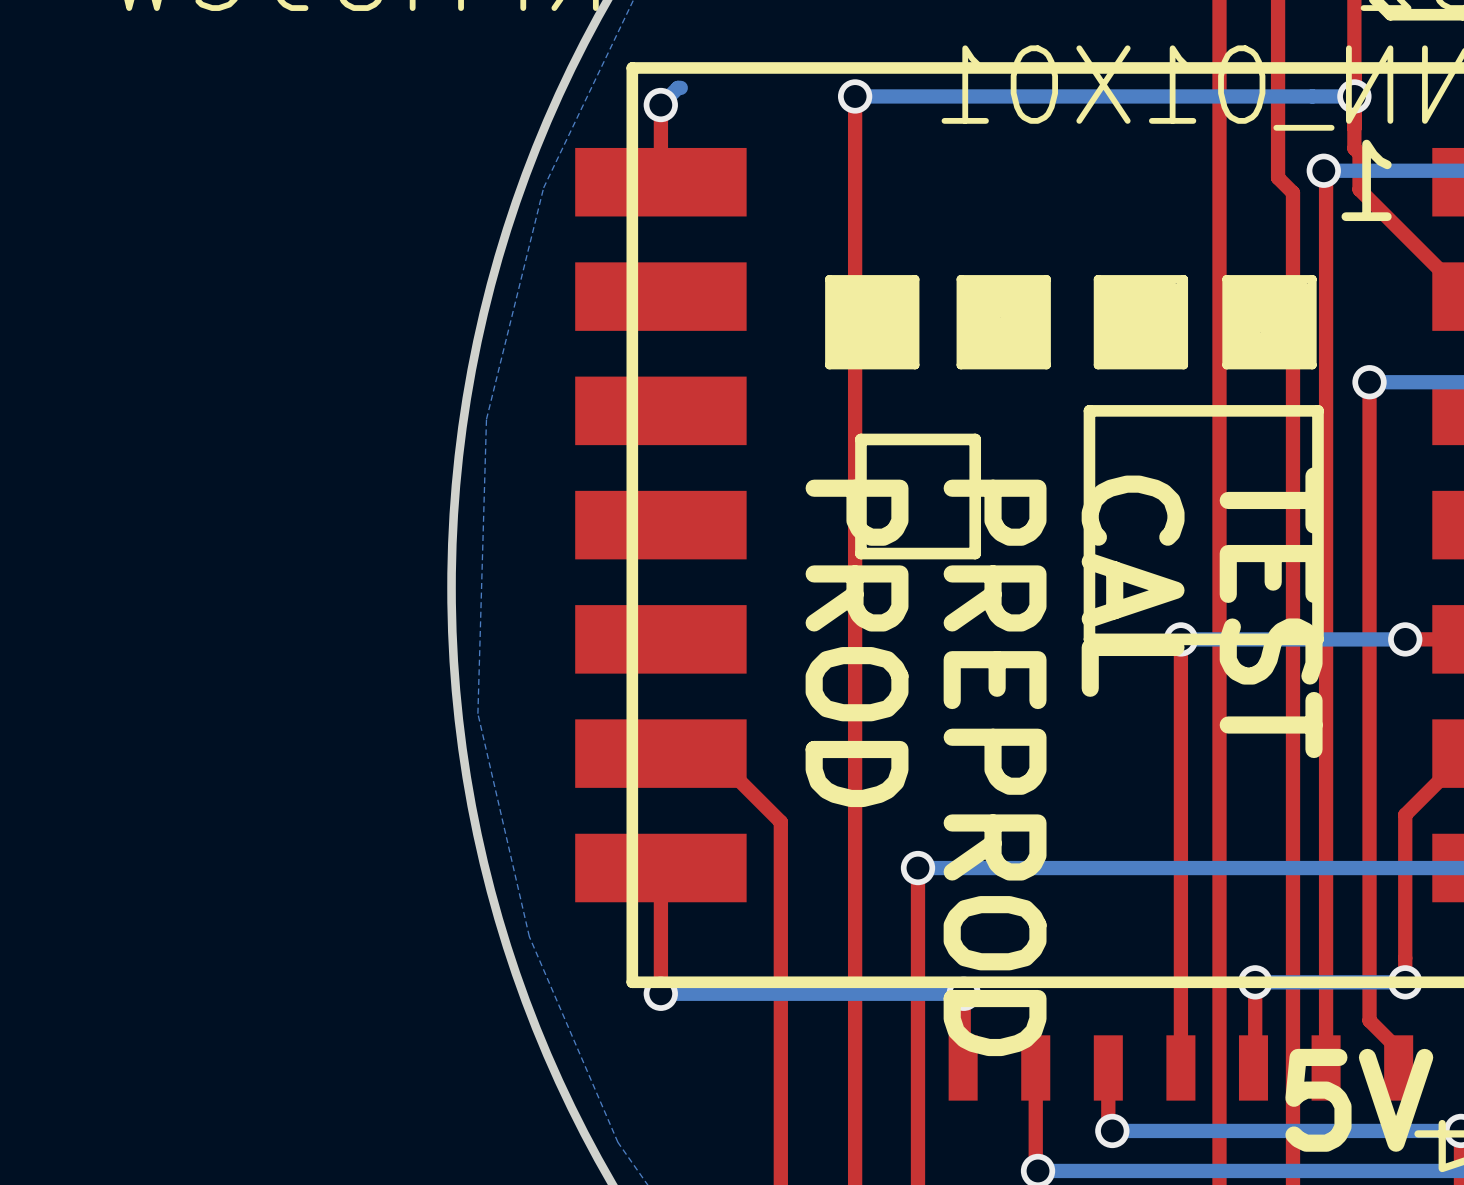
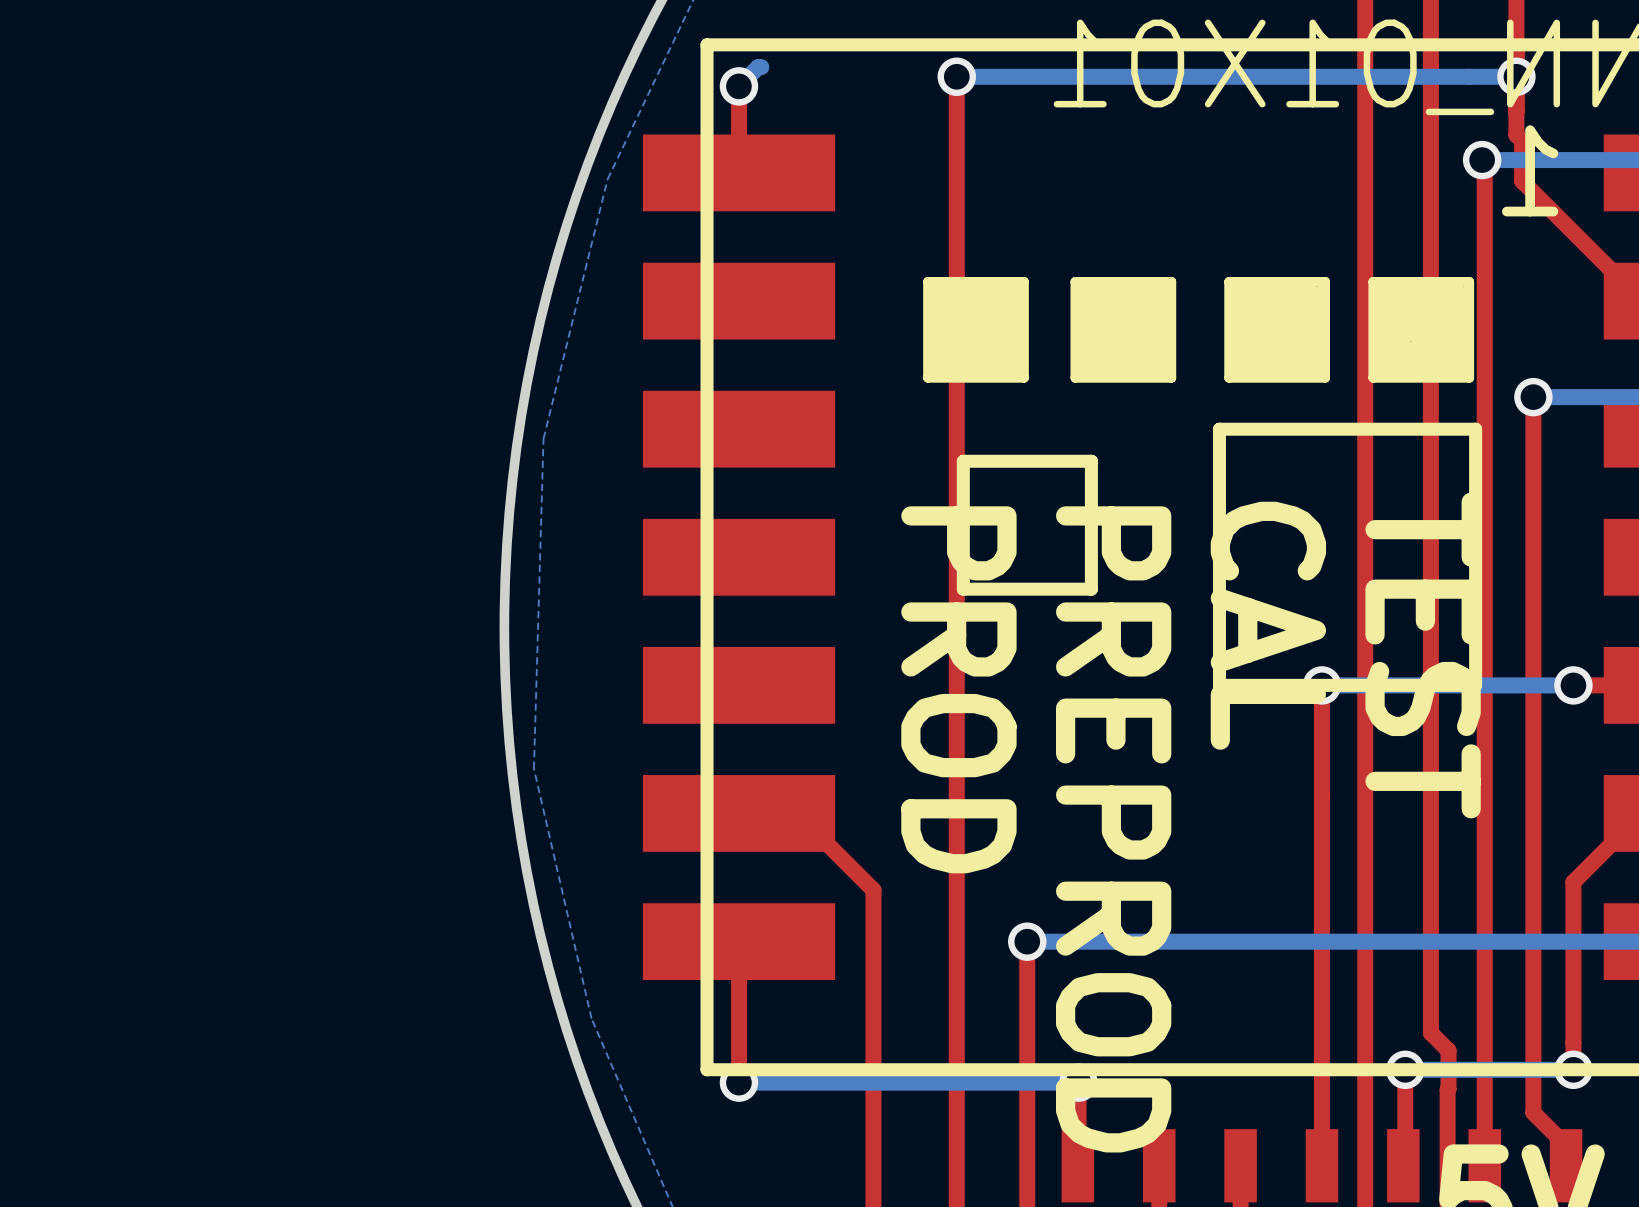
top track: (1278, 177) (1292, 192) (1292, 1000) -> (1430, 168) (1430, 1032) (1448, 1050) (1448, 1089)

